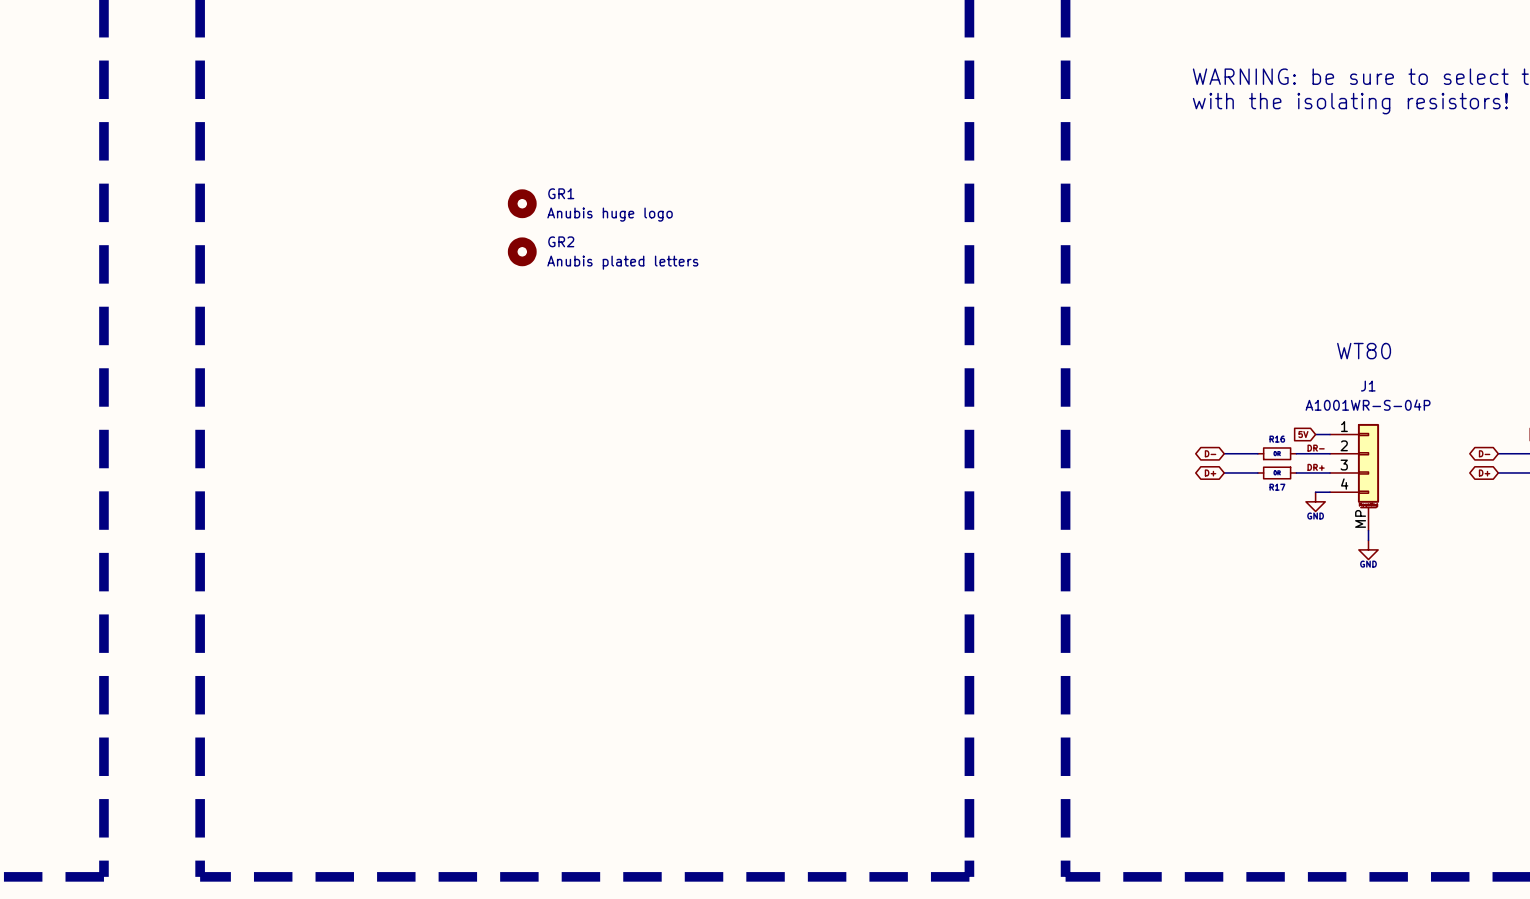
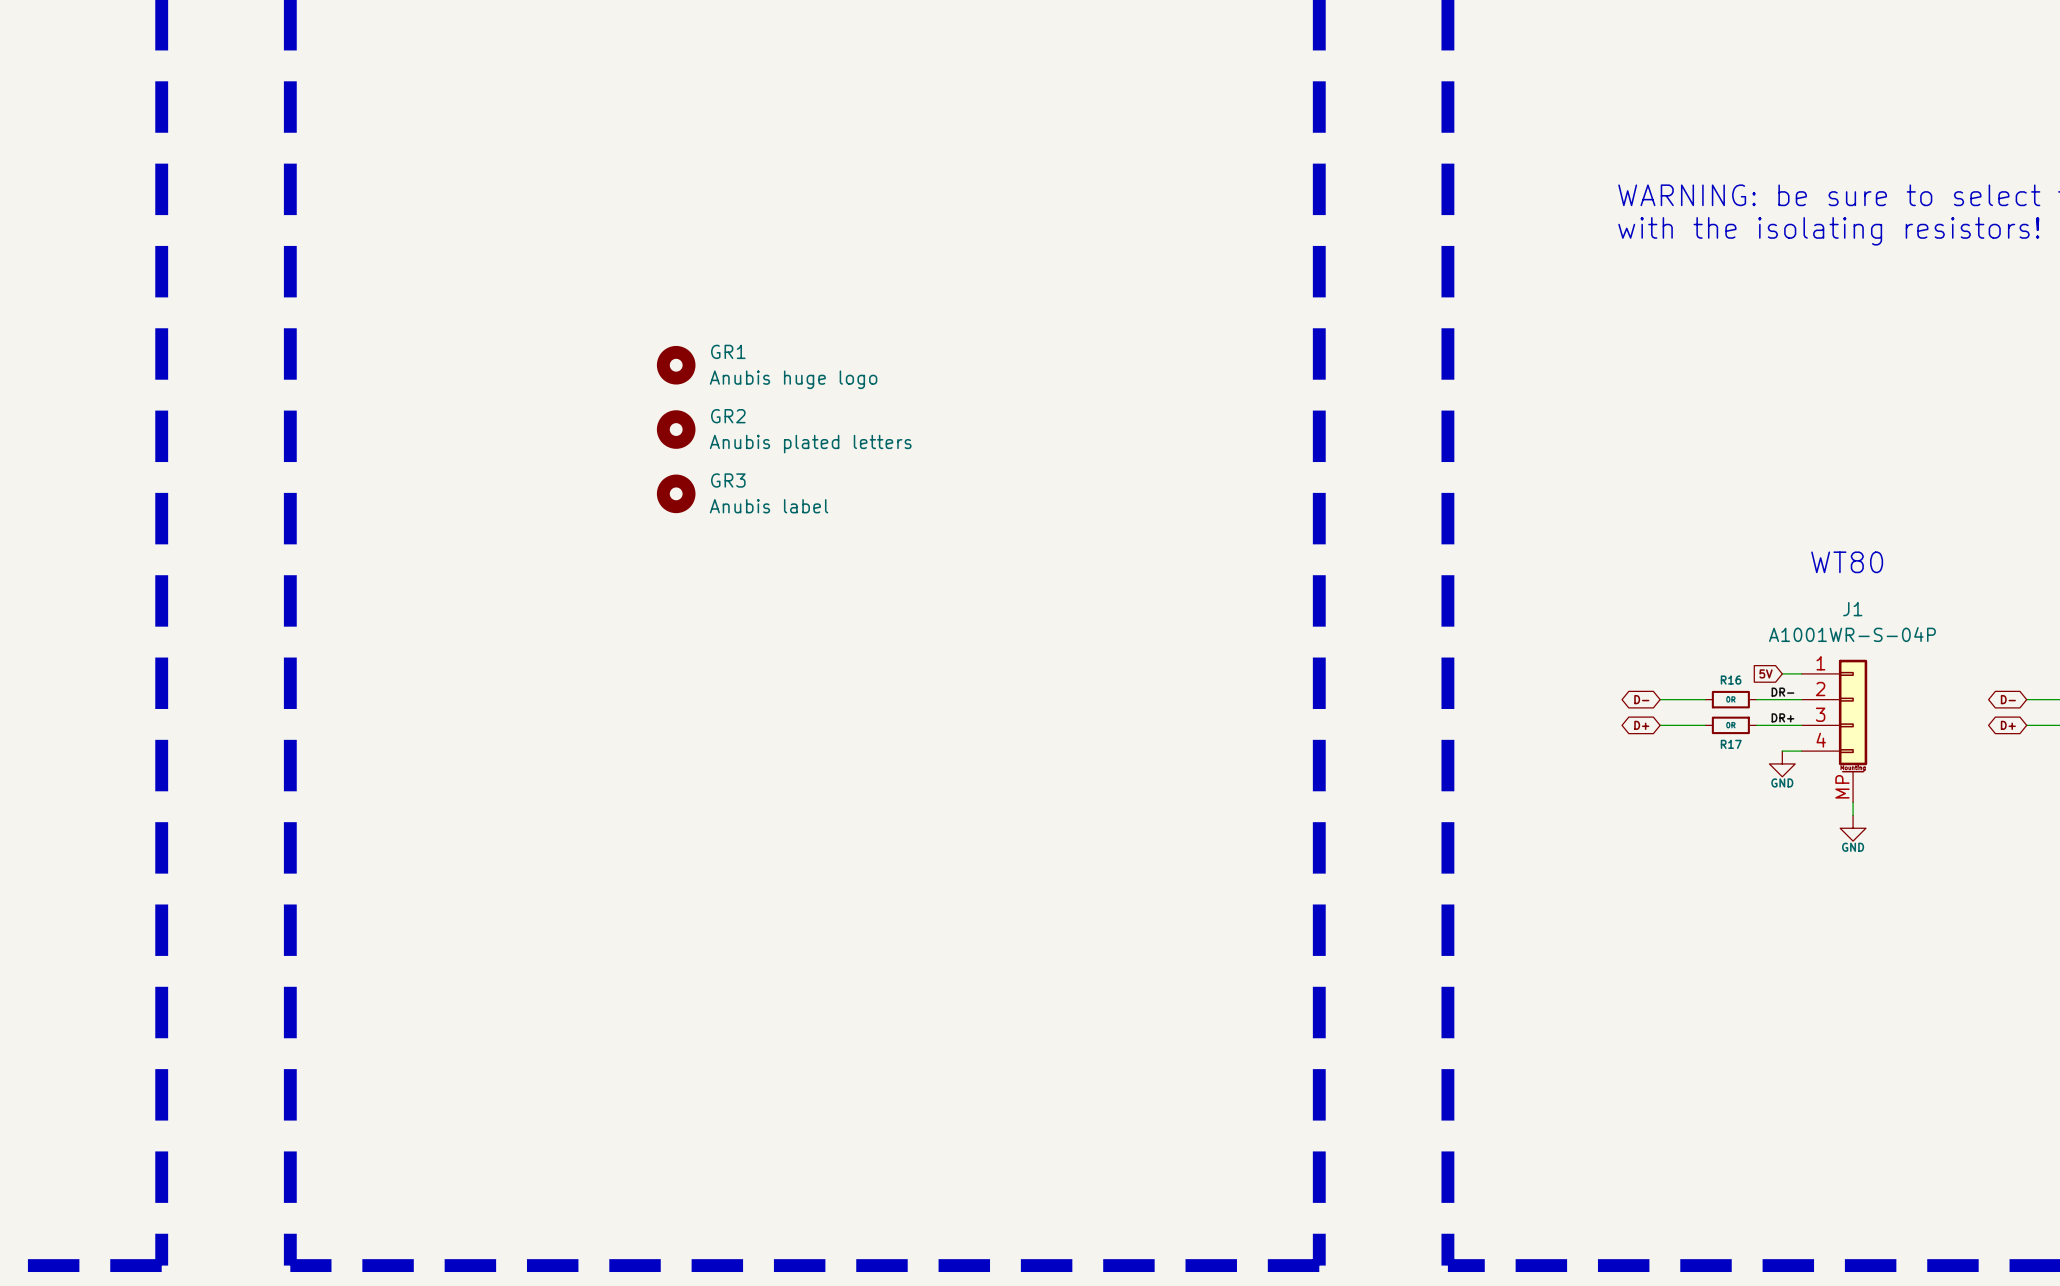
GR1 position: (522, 203) -> (676, 365)
GR2 position: (522, 251) -> (676, 429)
GR3: none -> Anubis label (676, 493)

